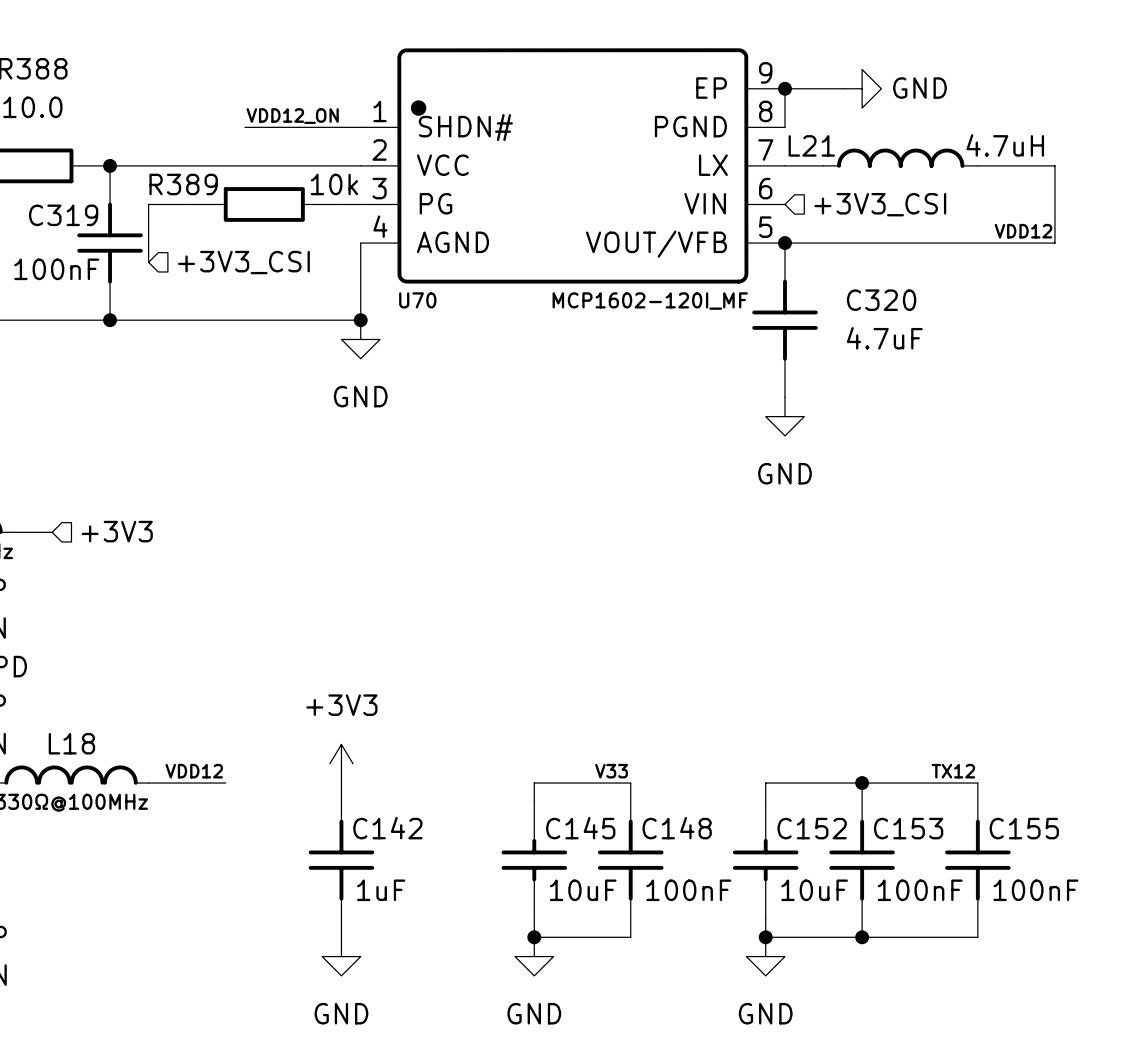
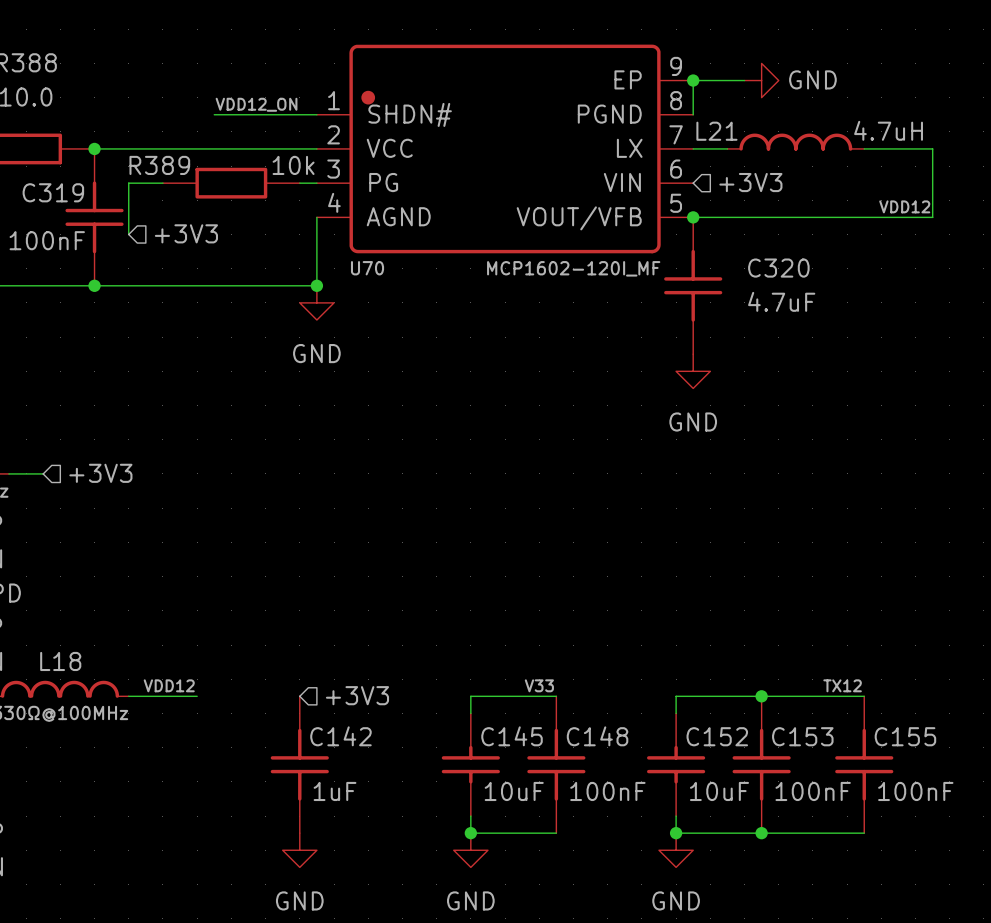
hierarchical label: +3V3_CSI (880, 204) -> +3V3 (750, 182)
hierarchical label: +3V3_CSI (243, 262) -> +3V3 (186, 233)
power symbol: +3V3 (341, 763) -> none
hierarchical label: none -> +3V3 (357, 695)

